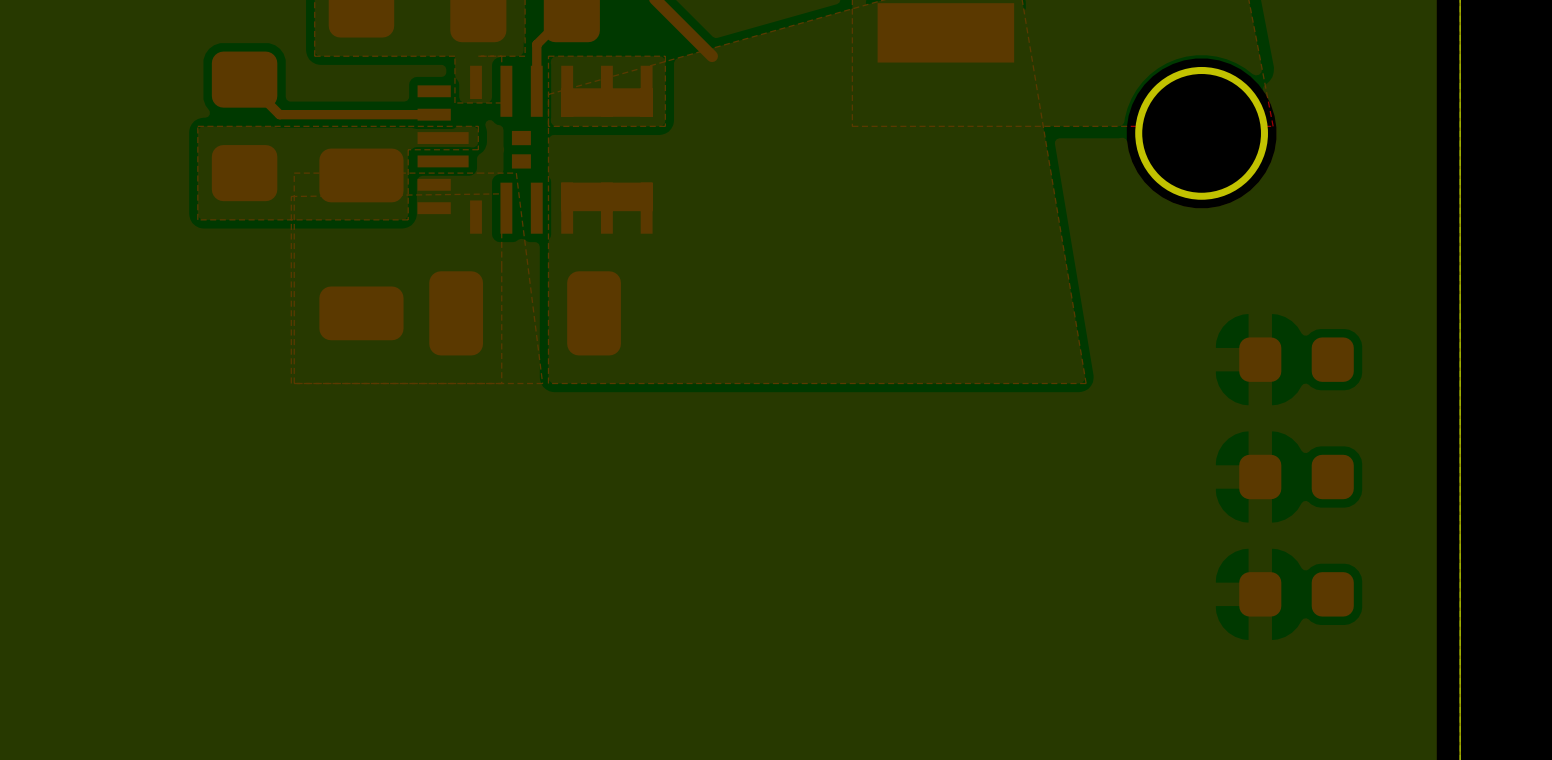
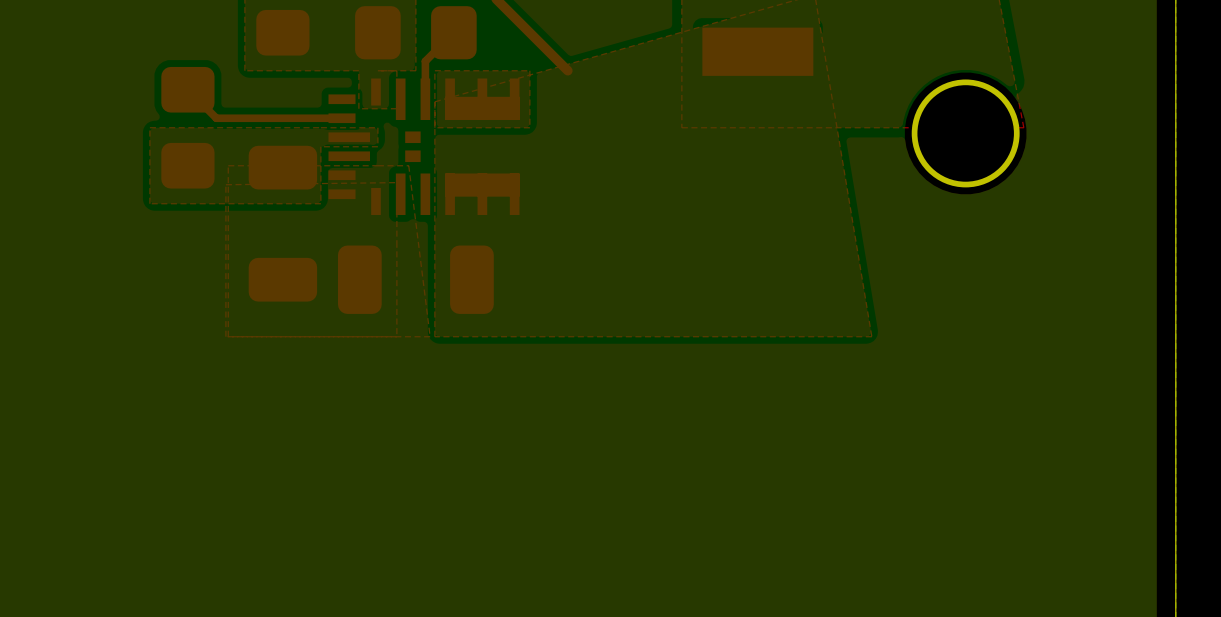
part: (1296, 359) -> none
part: (1296, 477) -> none
part: (1296, 594) -> none

